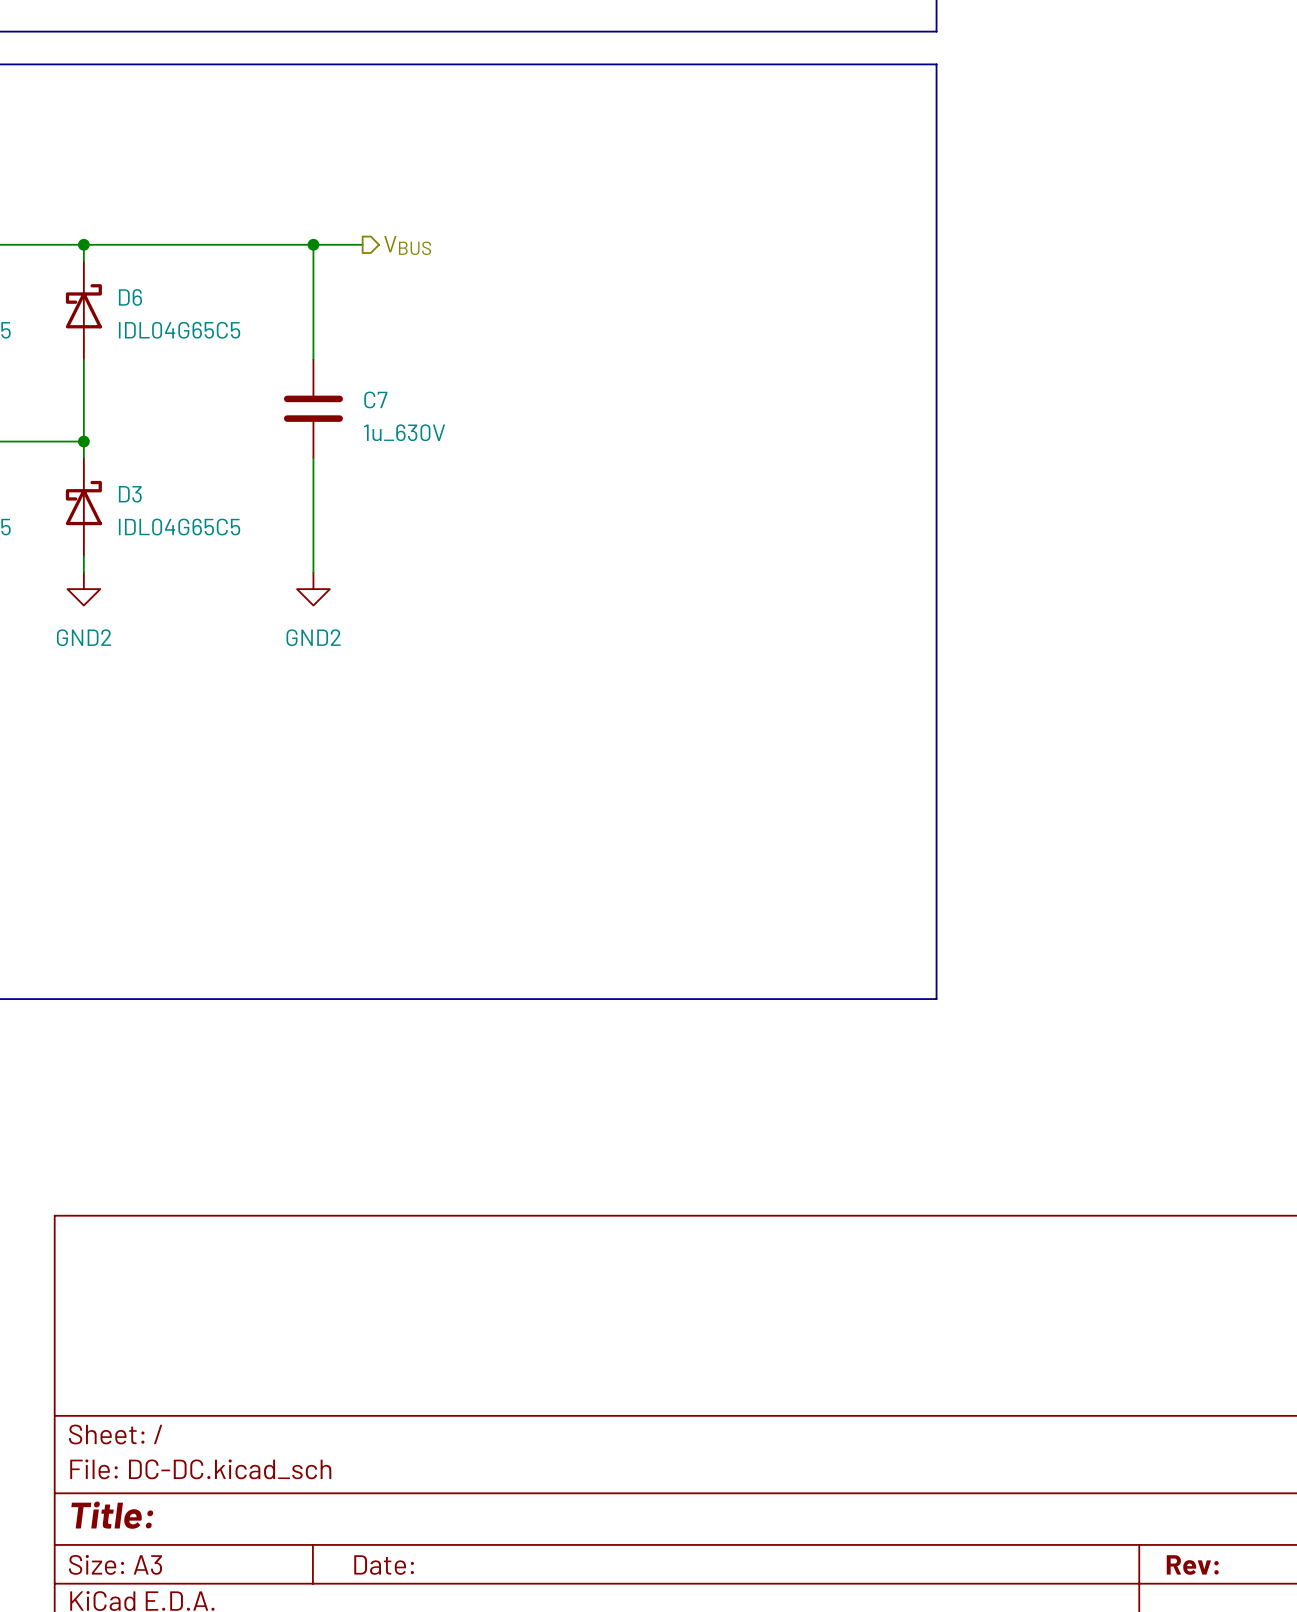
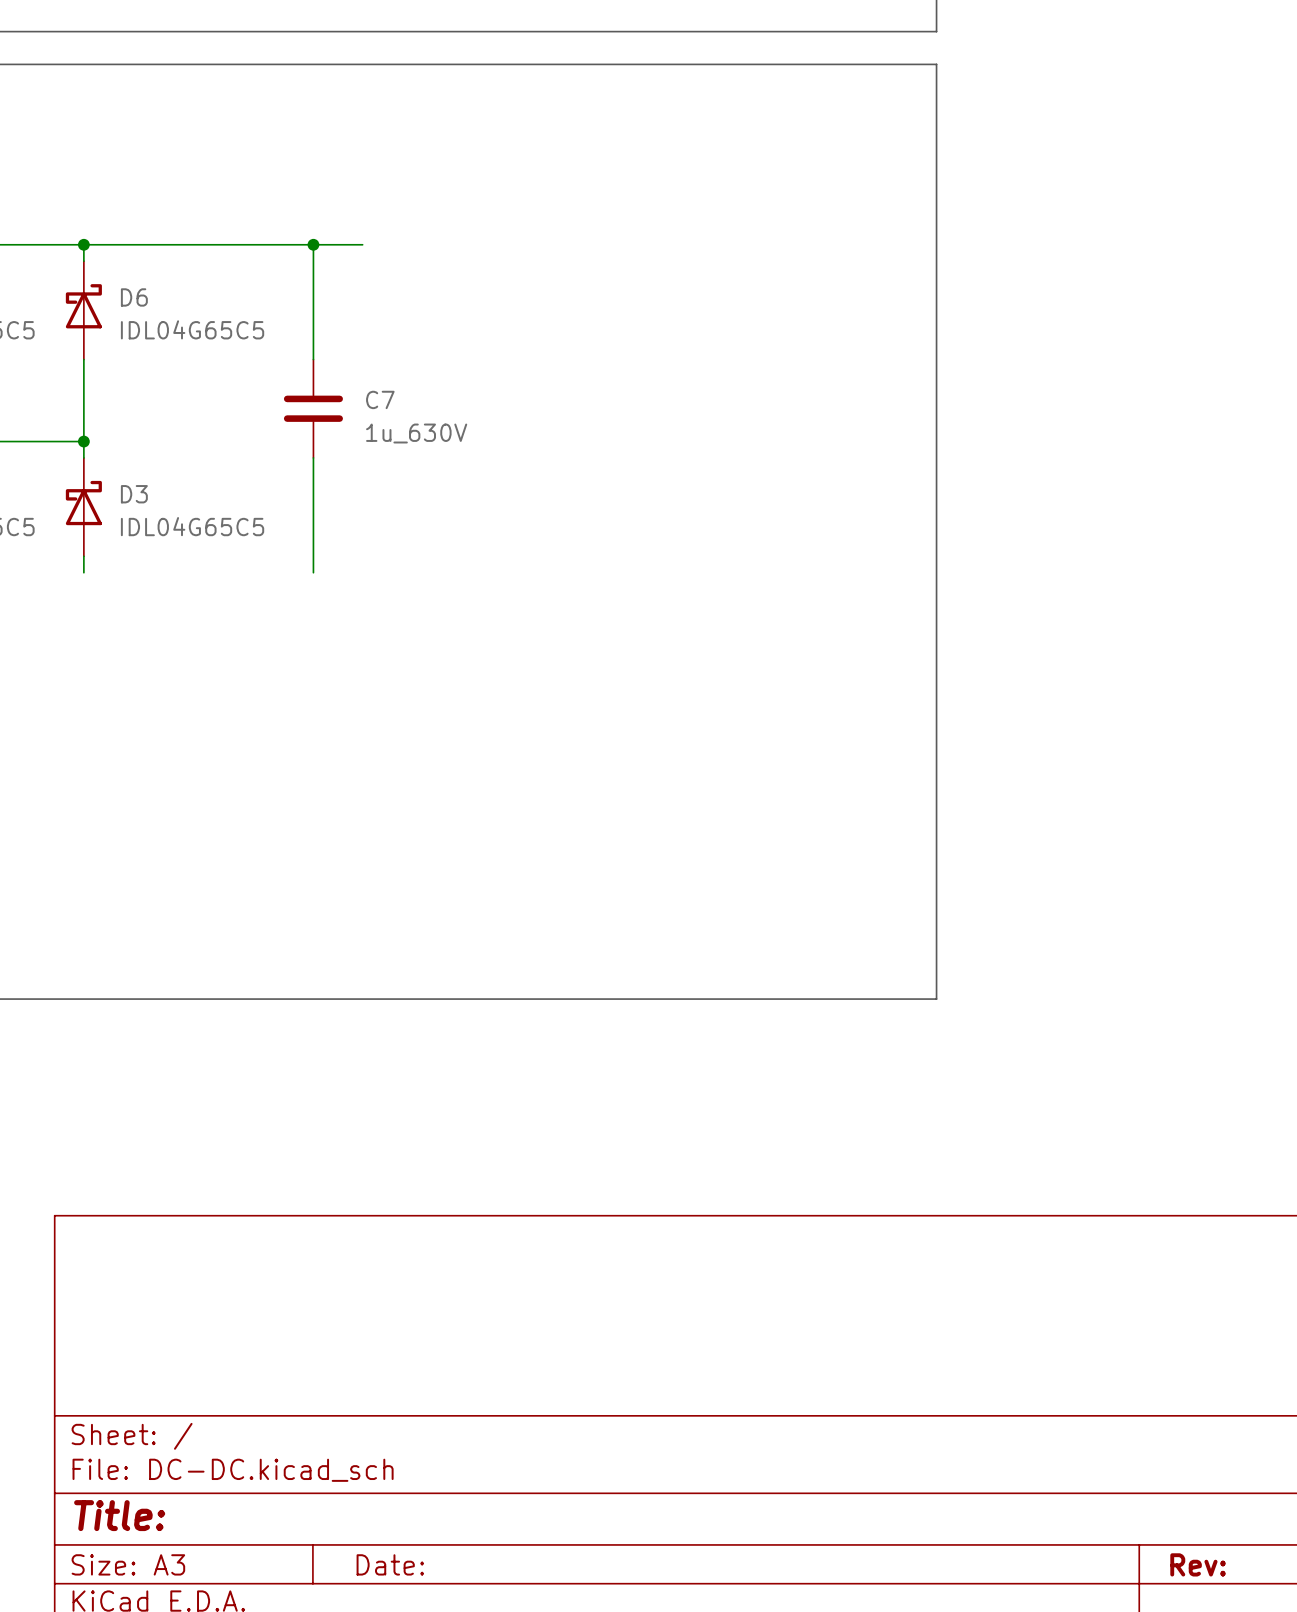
hierarchical label: VBUS (407, 245) -> none
power symbol: GND2 (83, 589) -> none
power symbol: GND2 (313, 589) -> none

